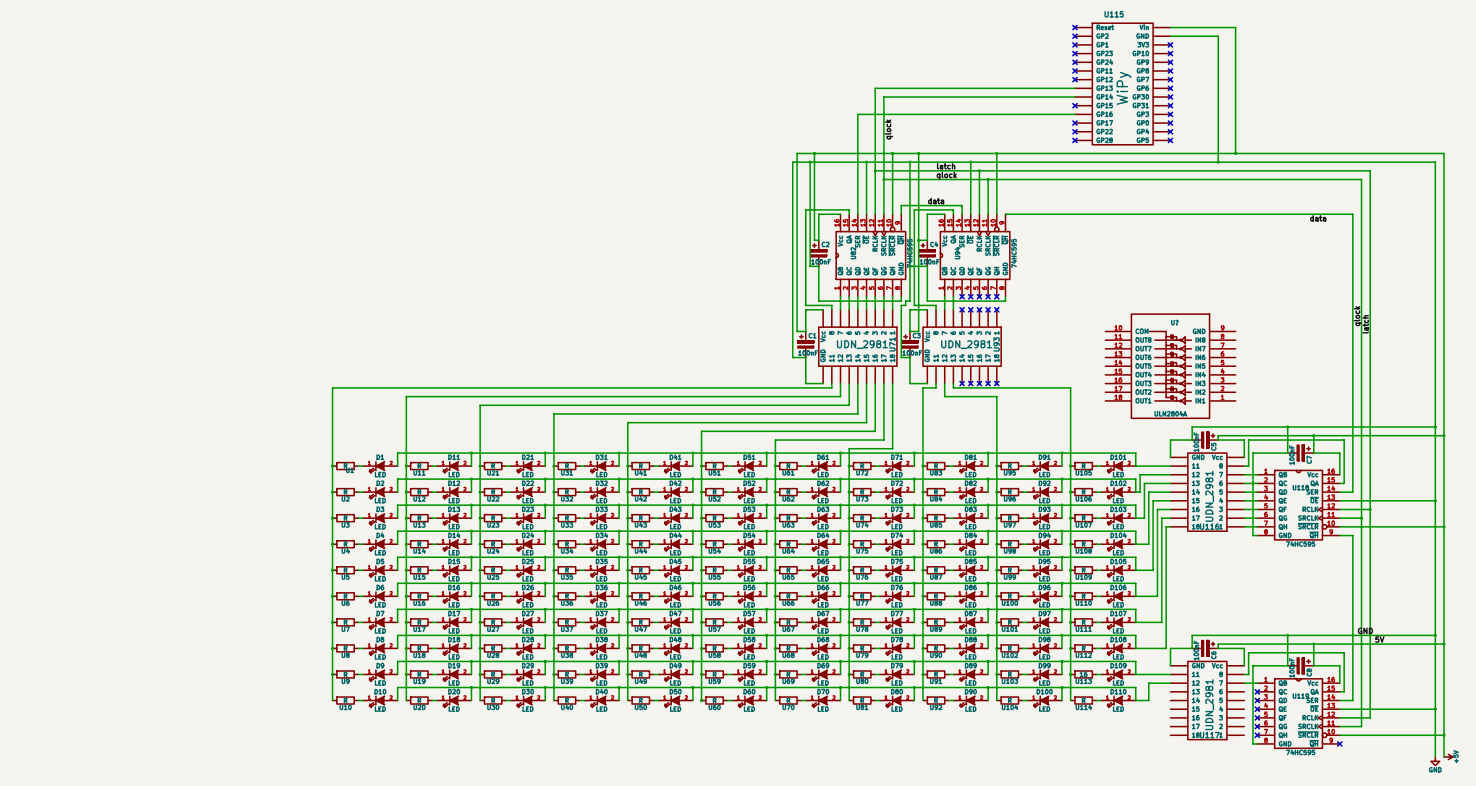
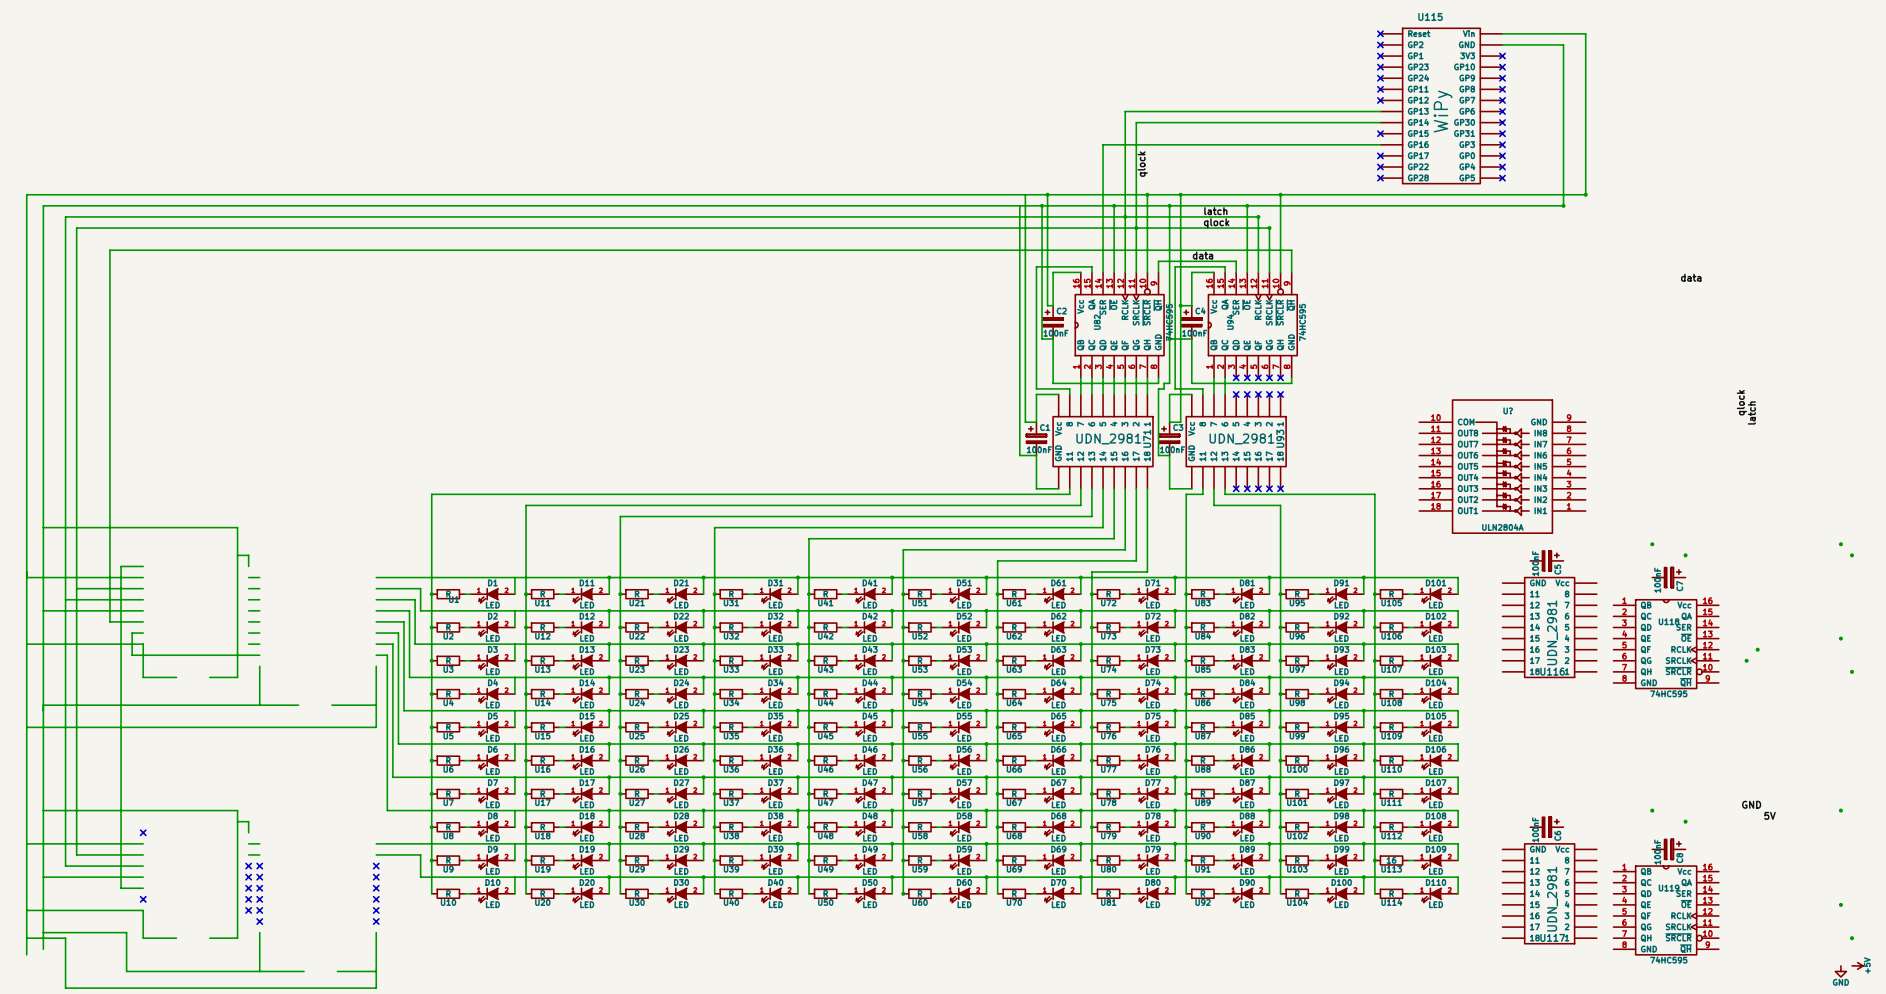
wire: none -> (1025, 194) (26, 194) (26, 954)
wire: (1235, 153) (1444, 153) (1444, 756) -> none
wire: none -> (1019, 205) (43, 205) (43, 949)
wire: (1218, 162) (1435, 162) (1435, 756) -> none
wire: none -> (1125, 216) (65, 216) (65, 866) (143, 866)
wire: (979, 170) (1370, 170) (1370, 717) (1339, 717) -> none
wire: none -> (1136, 228) (76, 228) (76, 854) (143, 854)
wire: (988, 179) (1361, 179) (1361, 726) (1339, 726) -> none
wire: (1005, 214) (1352, 214) (1352, 492) (1339, 492) -> (1291, 272) (1291, 250) (109, 250) (109, 621) (143, 621)
wire: none -> (43, 527) (237, 527) (237, 677) (209, 677)
wire: (1287, 427) (1287, 453) (1252, 453) (1252, 535) (1257, 535) -> none
wire: (1435, 427) (1192, 427) (1192, 440) (1170, 440) (1170, 457) -> none
wire: none -> (237, 555) (248, 555) (248, 566)
wire: (1313, 435) (1313, 453) (1339, 453) (1339, 474) -> none
wire: (1444, 435) (1218, 435) (1218, 440) (1244, 440) (1244, 457) -> none
wire: none -> (143, 566) (121, 566) (121, 888) (143, 888)
wire: none -> (26, 577) (143, 577)
wire: none -> (248, 577) (259, 577)
wire: none -> (376, 577) (514, 577)
wire: none -> (76, 588) (143, 588)
wire: none -> (248, 588) (259, 588)
wire: none -> (376, 588) (420, 588) (420, 610) (514, 610)
wire: (1135, 466) (1170, 466) -> none
wire: (1244, 466) (1248, 466) (1248, 440) (1344, 440) (1344, 483) (1339, 483) -> none
wire: none -> (65, 599) (143, 599)
wire: none -> (248, 599) (259, 599)
wire: none -> (376, 599) (415, 599) (415, 644) (514, 644)
wire: (1170, 474) (1140, 474) (1140, 492) (1135, 492) -> none
wire: (1244, 474) (1257, 474) -> none
wire: none -> (43, 610) (143, 610)
wire: none -> (248, 610) (259, 610)
wire: none -> (376, 610) (409, 610) (409, 677) (514, 677)
wire: (1170, 483) (1144, 483) (1144, 518) (1135, 518) -> none
wire: (1244, 483) (1257, 483) -> none
wire: none -> (248, 621) (259, 621)
wire: none -> (376, 621) (403, 621) (403, 710) (514, 710)
wire: (1170, 492) (1148, 492) (1148, 544) (1135, 544) -> none
wire: (1244, 492) (1257, 492) -> none
wire: none -> (143, 633) (132, 633) (132, 655) (259, 655)
wire: none -> (248, 633) (259, 633)
wire: none -> (376, 633) (398, 633) (398, 744) (514, 744)
wire: (1170, 500) (1153, 500) (1153, 570) (1135, 570) -> none
wire: (1244, 500) (1257, 500) -> none
wire: (1339, 500) (1435, 500) -> none
wire: none -> (26, 644) (143, 644) (143, 677) (176, 677)
wire: none -> (248, 644) (259, 644)
wire: none -> (376, 644) (392, 644) (392, 777) (514, 777)
wire: (1170, 509) (1157, 509) (1157, 596) (1135, 596) -> none
wire: (1244, 509) (1257, 509) -> none
wire: (1339, 509) (1370, 509) -> none
wire: none -> (376, 655) (387, 655) (387, 810) (514, 810)
wire: (1170, 518) (1161, 518) (1161, 622) (1135, 622) -> none
wire: (1244, 518) (1257, 518) -> none
wire: (1339, 518) (1361, 518) -> none
wire: none -> (259, 666) (259, 705)
wire: none -> (376, 666) (376, 727) (26, 727)
wire: (1170, 526) (1166, 526) (1166, 648) (1135, 648) -> none
wire: (1244, 526) (1257, 526) -> none
wire: (1339, 526) (1444, 526) -> none
wire: (1339, 535) (1352, 535) (1352, 700) (1339, 700) -> none
wire: none -> (43, 705) (298, 705)
wire: none -> (331, 705) (376, 705)
wire: none -> (43, 810) (237, 810) (237, 938) (209, 938)
wire: (1287, 635) (1287, 665) (1252, 665) (1252, 743) (1257, 743) -> none
wire: (1435, 635) (1192, 635) (1192, 648) (1170, 648) (1170, 665) -> none
wire: none -> (237, 821) (248, 821) (248, 832)
wire: (1313, 644) (1313, 665) (1339, 665) (1339, 683) -> none
wire: (1444, 644) (1218, 644) (1218, 648) (1244, 648) (1244, 665) -> none
no-connect mark: none -> (143, 832)
wire: none -> (26, 843) (143, 843)
wire: none -> (248, 843) (259, 843)
wire: none -> (376, 843) (514, 843)
wire: none -> (248, 854) (259, 854)
wire: none -> (376, 854) (420, 854) (420, 877) (514, 877)
wire: (1135, 674) (1170, 674) -> none
wire: (1244, 674) (1248, 674) (1248, 652) (1344, 652) (1344, 691) (1339, 691) -> none
no-connect mark: none -> (248, 866)
no-connect mark: none -> (259, 866)
no-connect mark: none -> (376, 866)
wire: (1170, 683) (1148, 683) (1148, 700) (1135, 700) -> none
wire: (1244, 683) (1257, 683) -> none
wire: none -> (43, 877) (143, 877)
no-connect mark: none -> (248, 877)
no-connect mark: none -> (259, 877)
no-connect mark: none -> (376, 877)
no-connect mark: (1257, 691) -> none
no-connect mark: none -> (248, 888)
no-connect mark: none -> (259, 888)
no-connect mark: none -> (376, 888)
no-connect mark: (1257, 700) -> none
no-connect mark: none -> (143, 899)
no-connect mark: none -> (248, 899)
no-connect mark: none -> (259, 899)
no-connect mark: none -> (376, 899)
no-connect mark: (1257, 709) -> none
wire: (1339, 709) (1435, 709) -> none
wire: none -> (26, 910) (143, 910) (143, 938) (176, 938)
no-connect mark: none -> (248, 910)
no-connect mark: none -> (259, 910)
no-connect mark: none -> (376, 910)
no-connect mark: (1257, 717) -> none
no-connect mark: none -> (259, 921)
no-connect mark: none -> (376, 921)
no-connect mark: (1257, 726) -> none
wire: none -> (43, 932) (126, 932) (126, 971) (304, 971)
wire: none -> (259, 932) (259, 971)
wire: none -> (376, 932) (376, 988) (65, 988) (65, 938) (26, 938)
no-connect mark: (1257, 735) -> none
wire: (1339, 735) (1444, 735) -> none
no-connect mark: (1339, 743) -> none
wire: none -> (337, 971) (376, 971)

